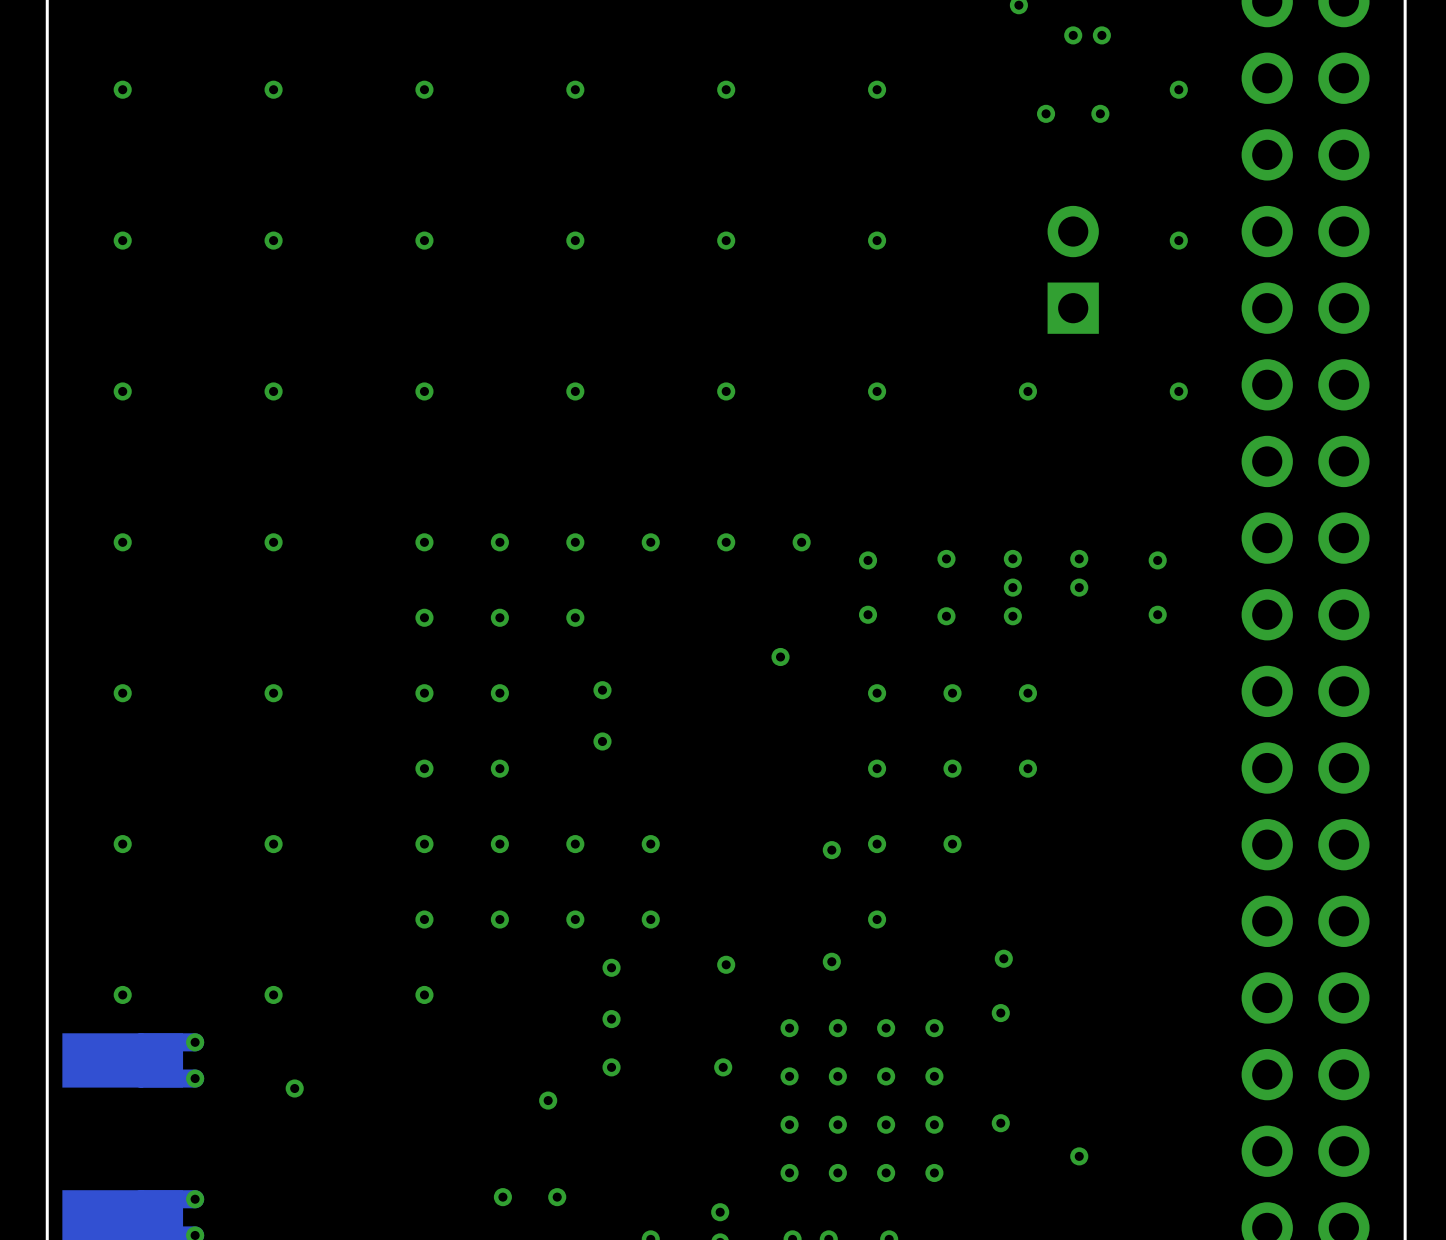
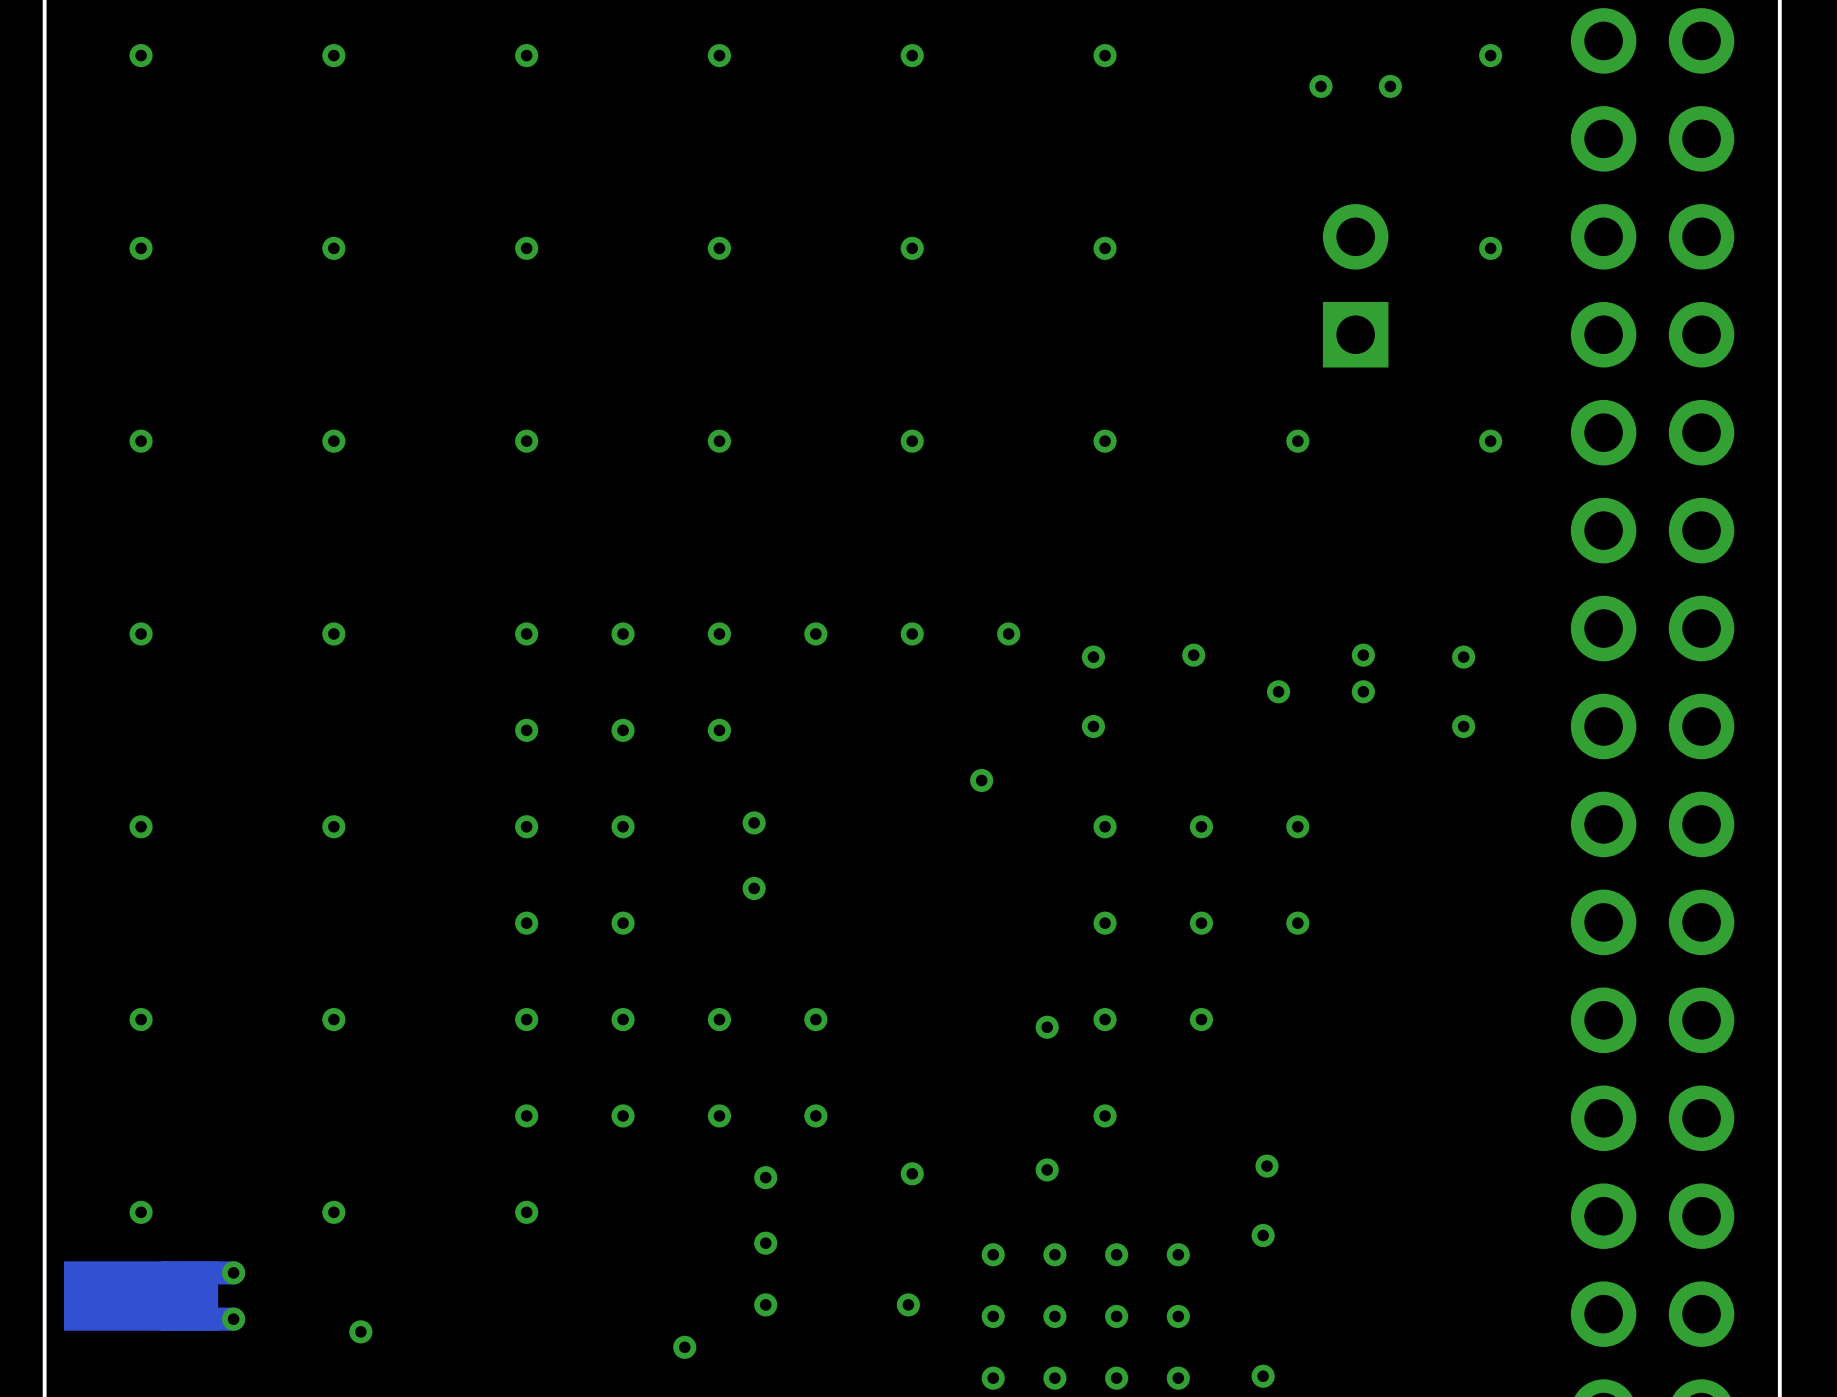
via: (1012, 558) -> none
via: (946, 616) -> none
via: (1012, 616) -> none

